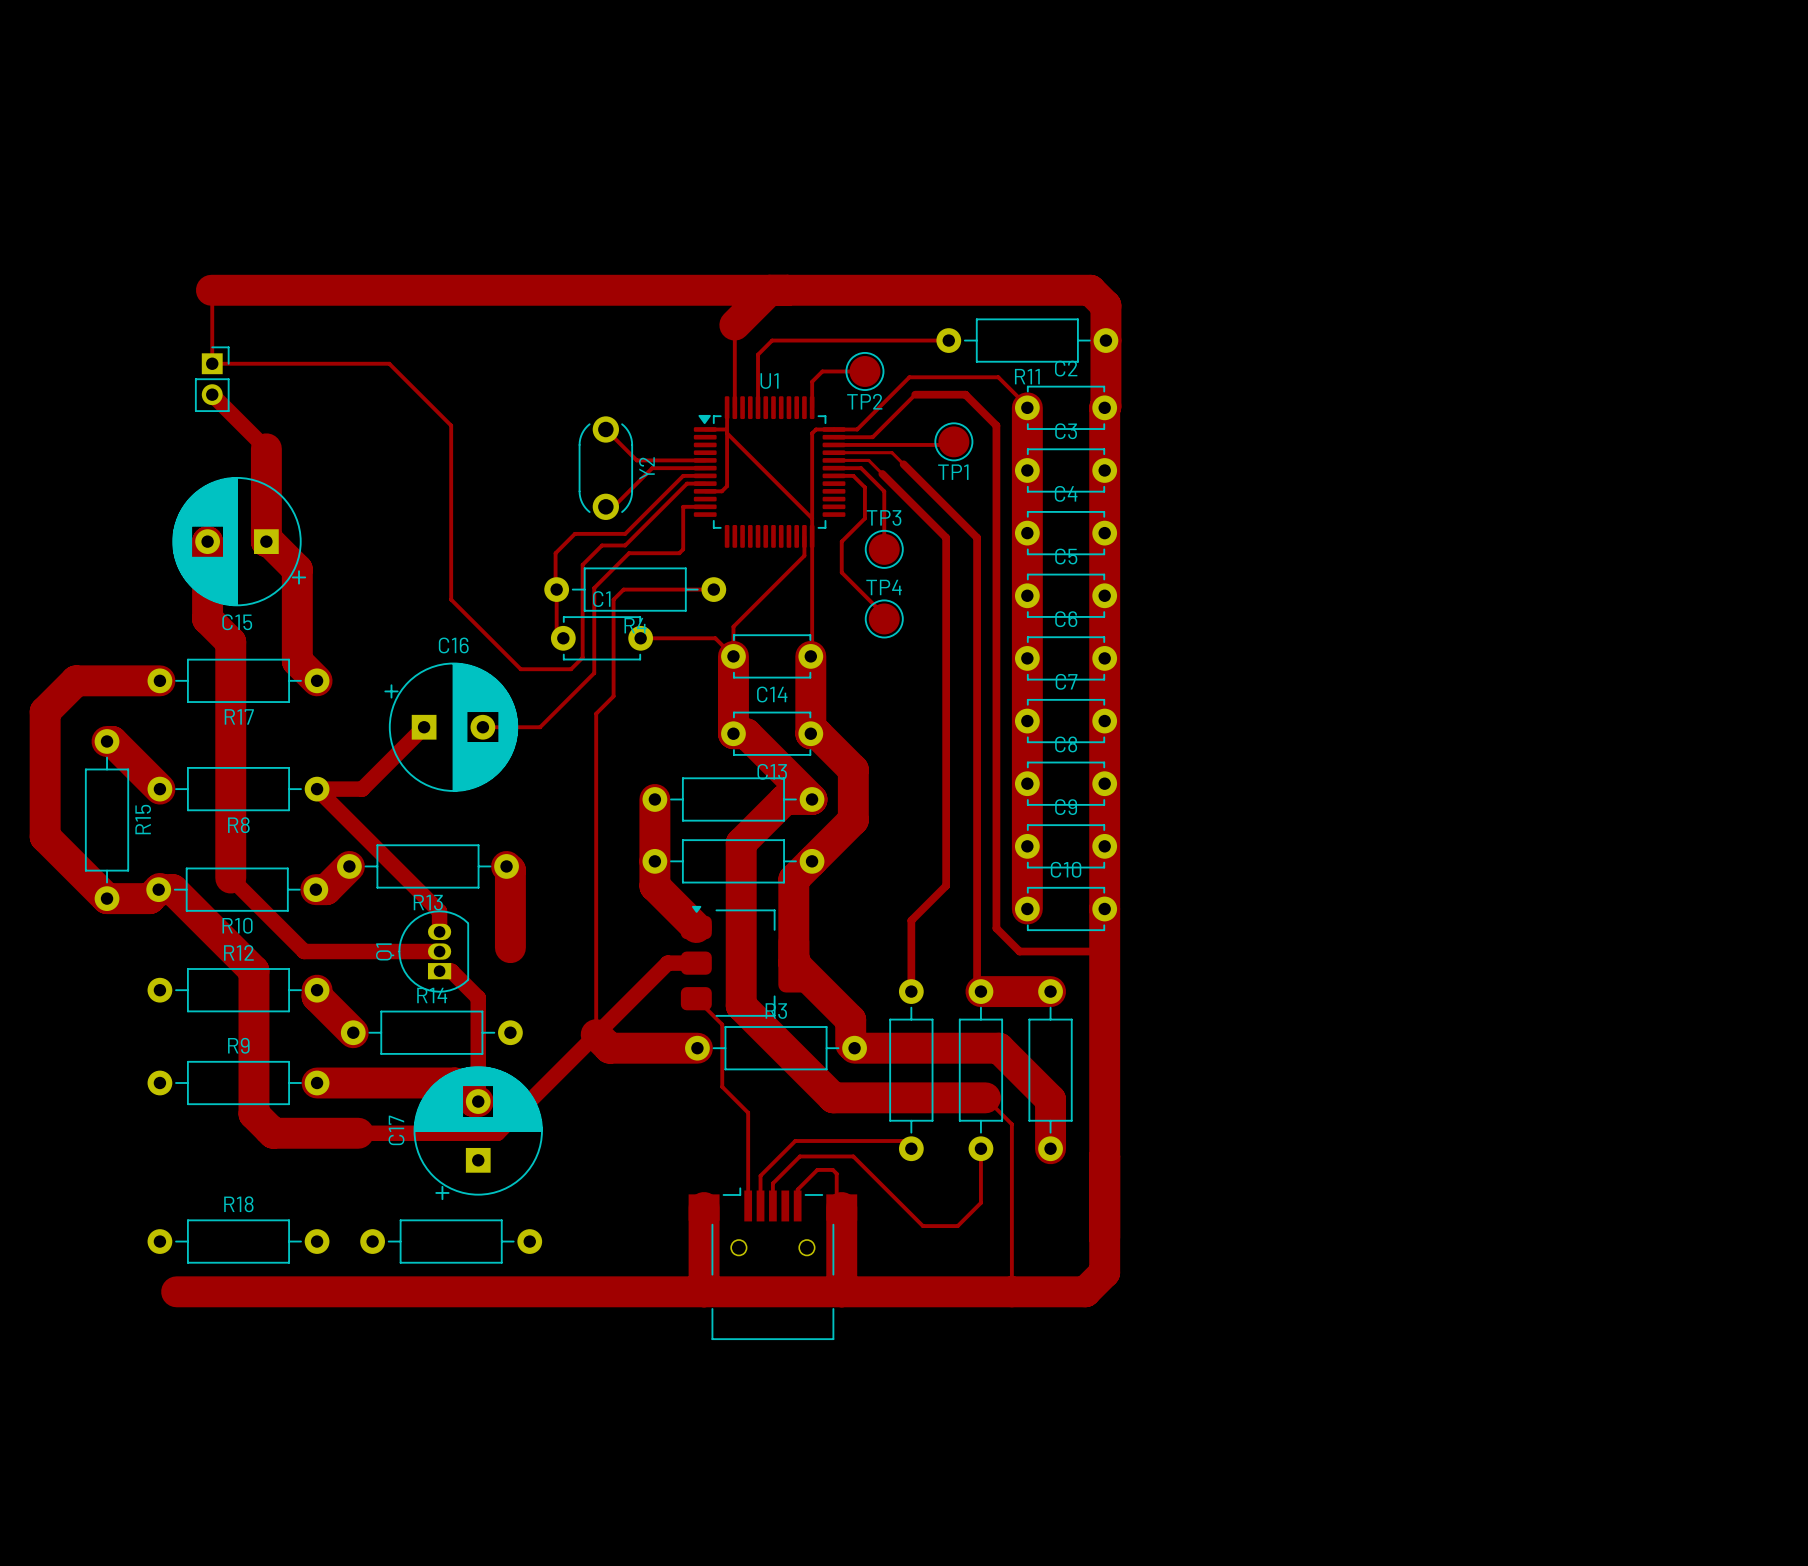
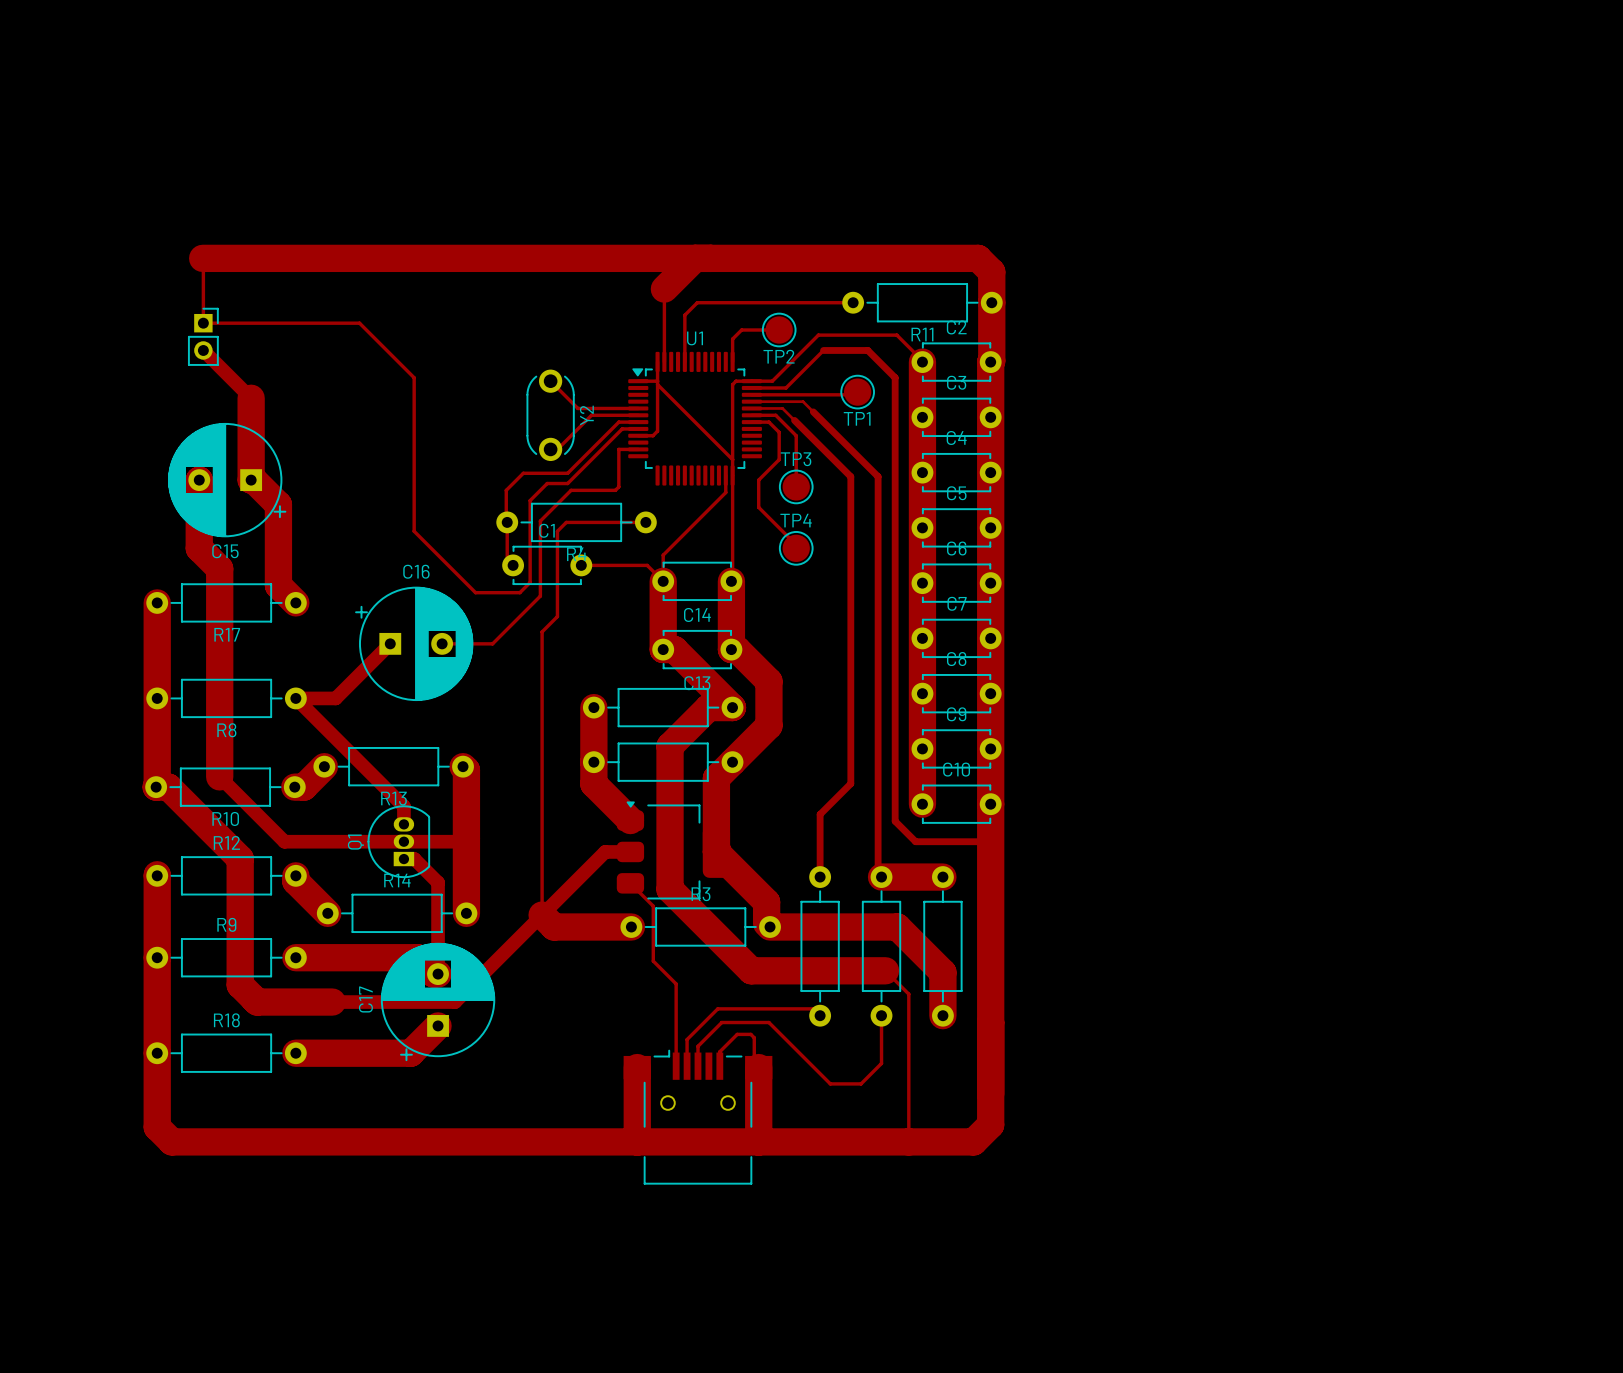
top track: (159, 680) (76, 680) (45, 711) (45, 836) (107, 898) (149, 898) (158, 889) -> (157, 602) (157, 786)
top track: (107, 741) (112, 741) (159, 789) -> none
R15: (107, 820) -> none
top track: none -> (403, 841) (463, 841) (466, 838) (466, 913)
top track: none -> (157, 874) (157, 1127) (171, 1141)
top track: none -> (438, 1025) (410, 1053) (295, 1053)
R18 position: (238, 1241) -> (226, 1053)
part: (451, 1241) -> none

